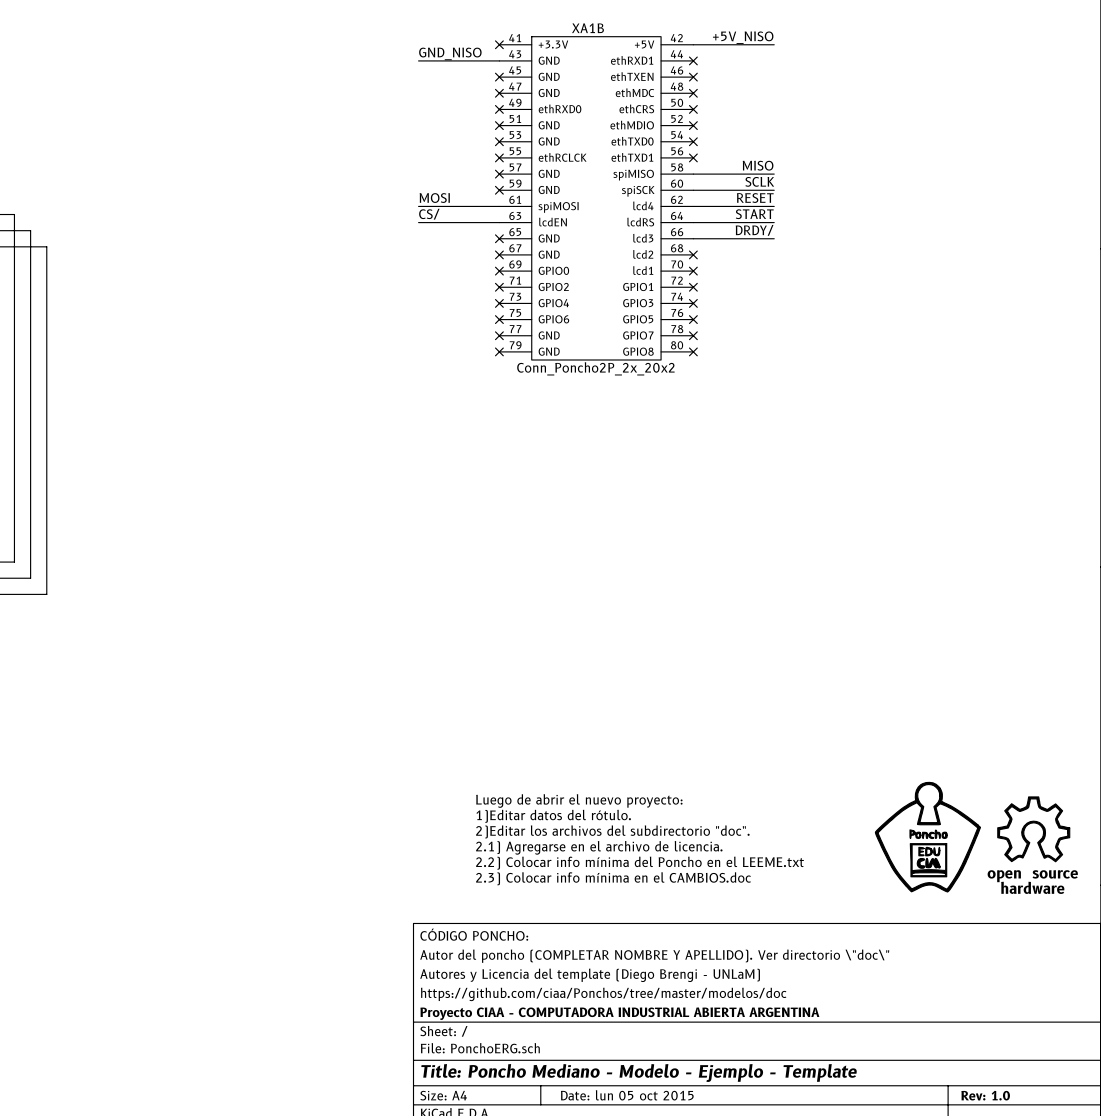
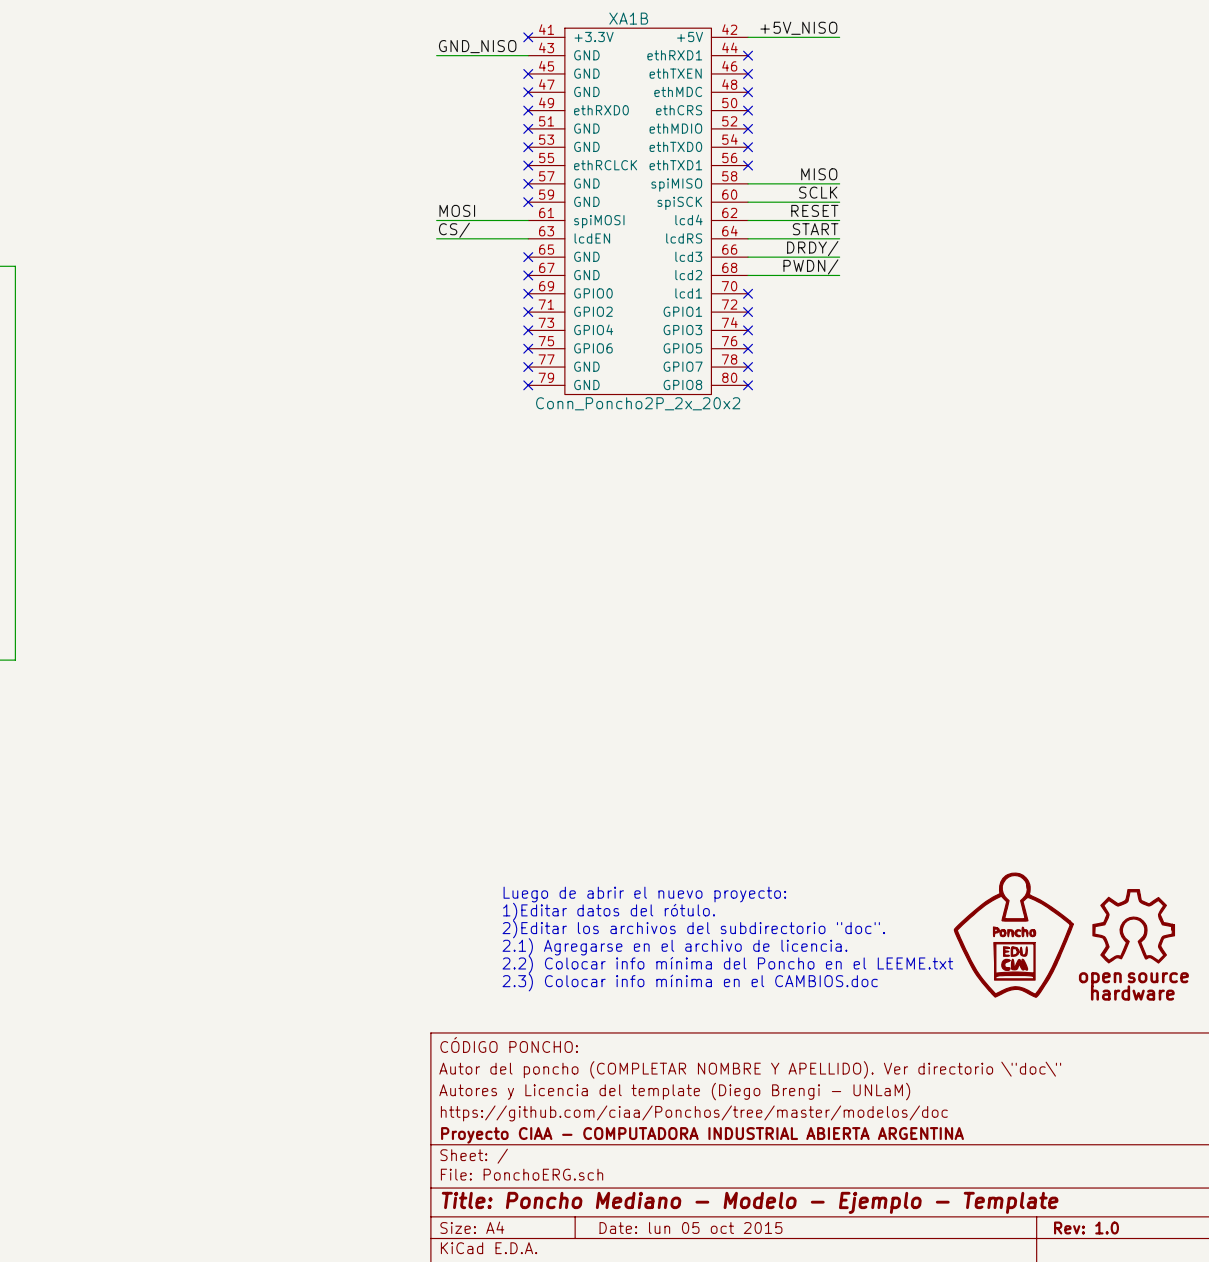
label: none -> PWDN/ (810, 266)
wire: none -> (748, 275) (839, 275)
no-connect mark: (693, 254) -> none

